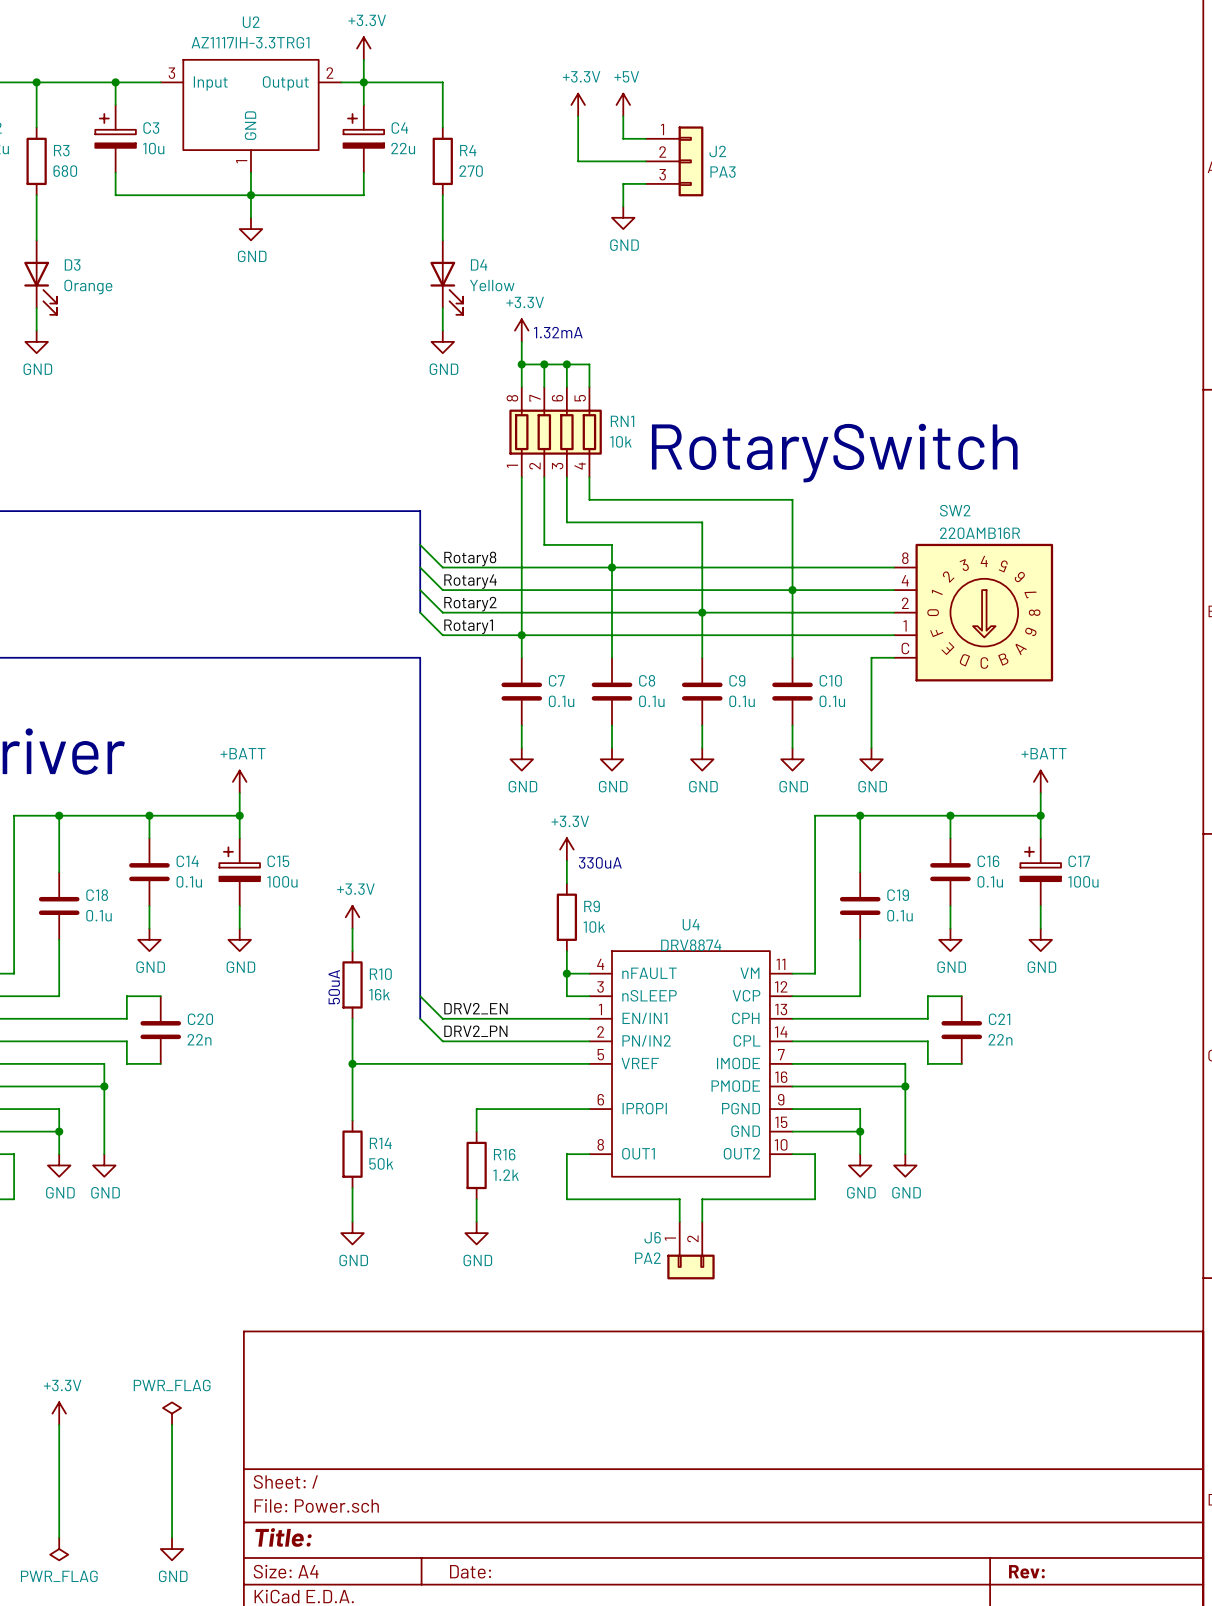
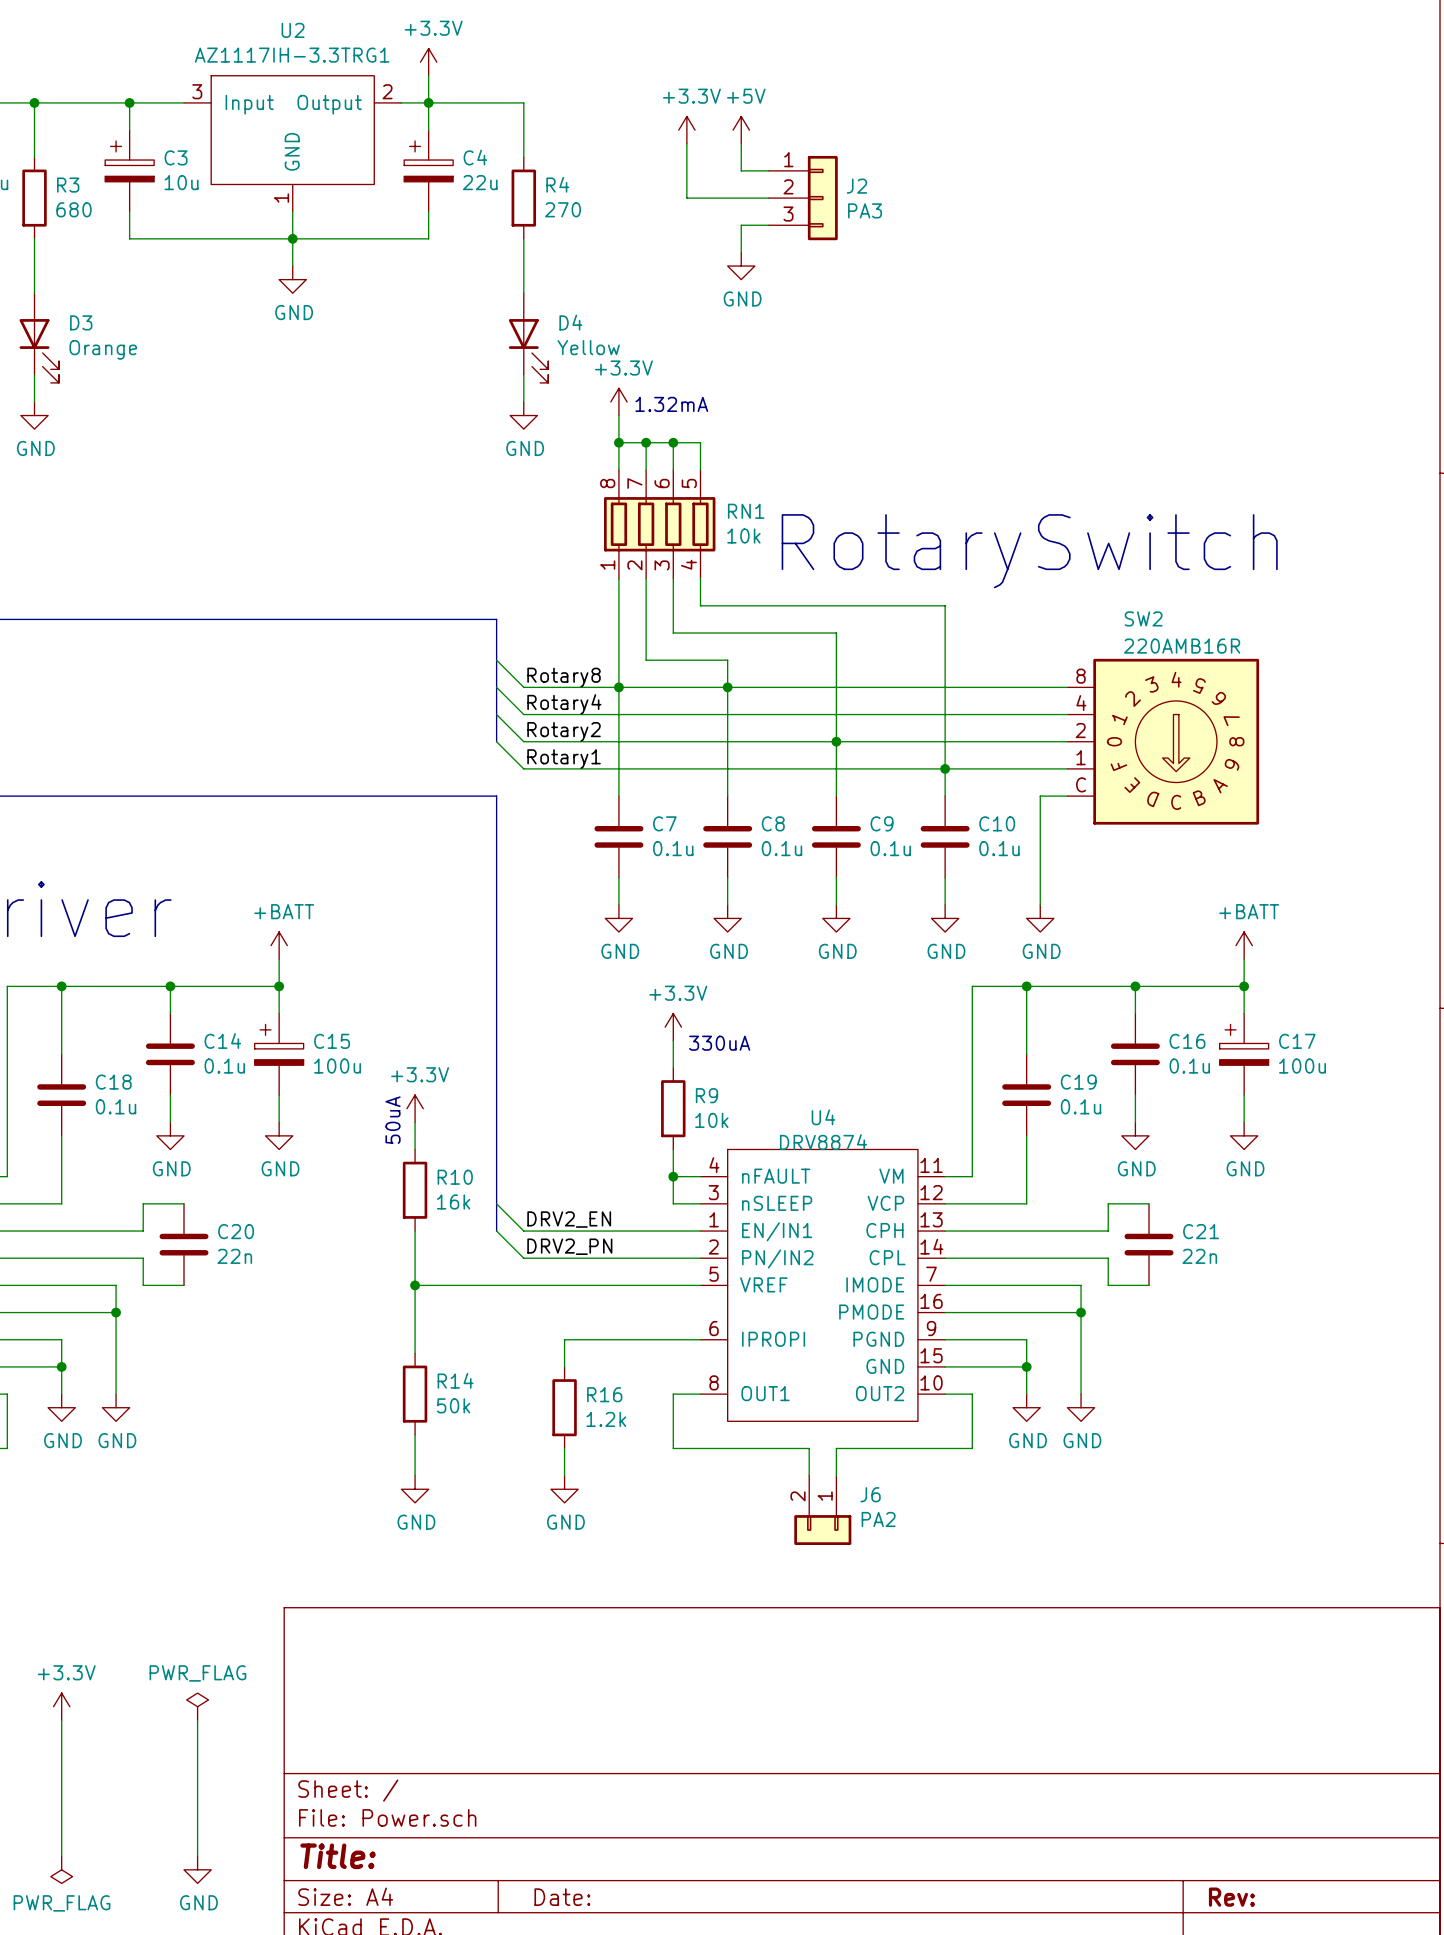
junction: none -> (618, 687)
junction position: (792, 590) -> (945, 768)
junction: (521, 635) -> none
text position: 50uA (334, 987) -> 50uA (393, 1120)
J6 flip: as is (690, 1266) -> left-right (822, 1530)

